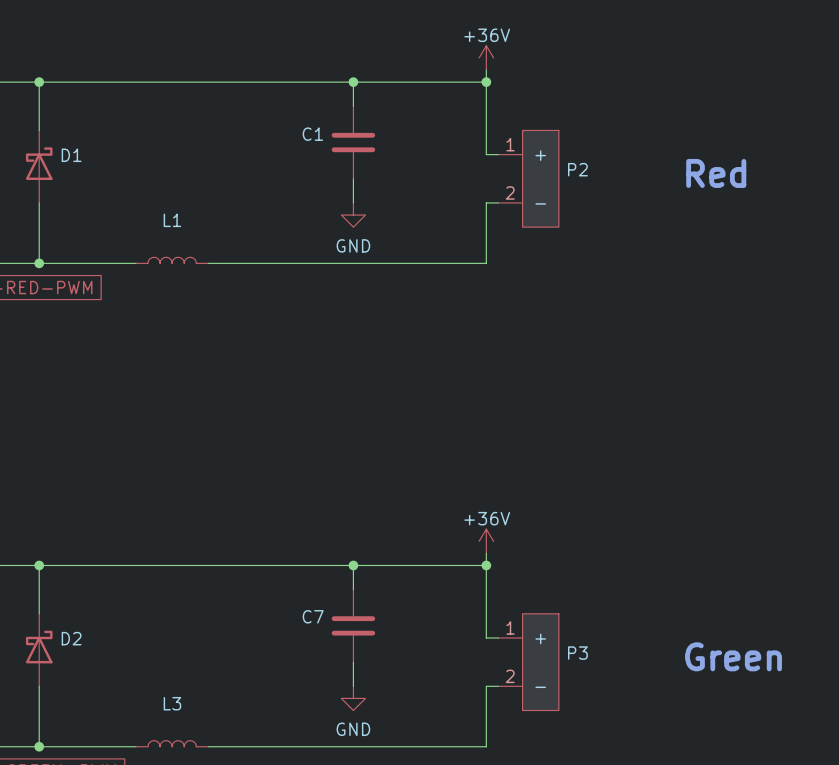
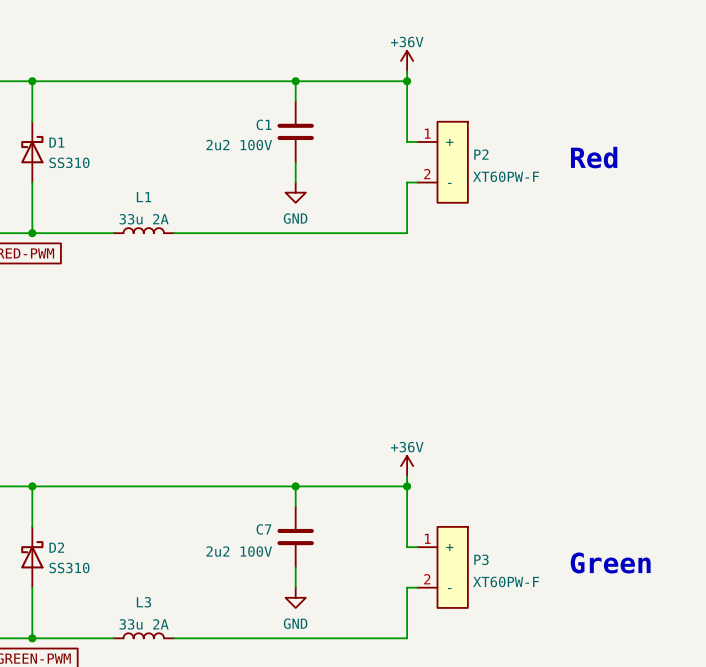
C1 value: none -> 2u2 100V (239, 145)
D1 value: none -> SS310 (69, 162)
P2 value: none -> XT60PW-F (506, 176)
L1 value: none -> 33u 2A (144, 219)
C7 value: none -> 2u2 100V (239, 551)
D2 value: none -> SS310 (69, 567)
P3 value: none -> XT60PW-F (506, 581)
L3 value: none -> 33u 2A (144, 624)

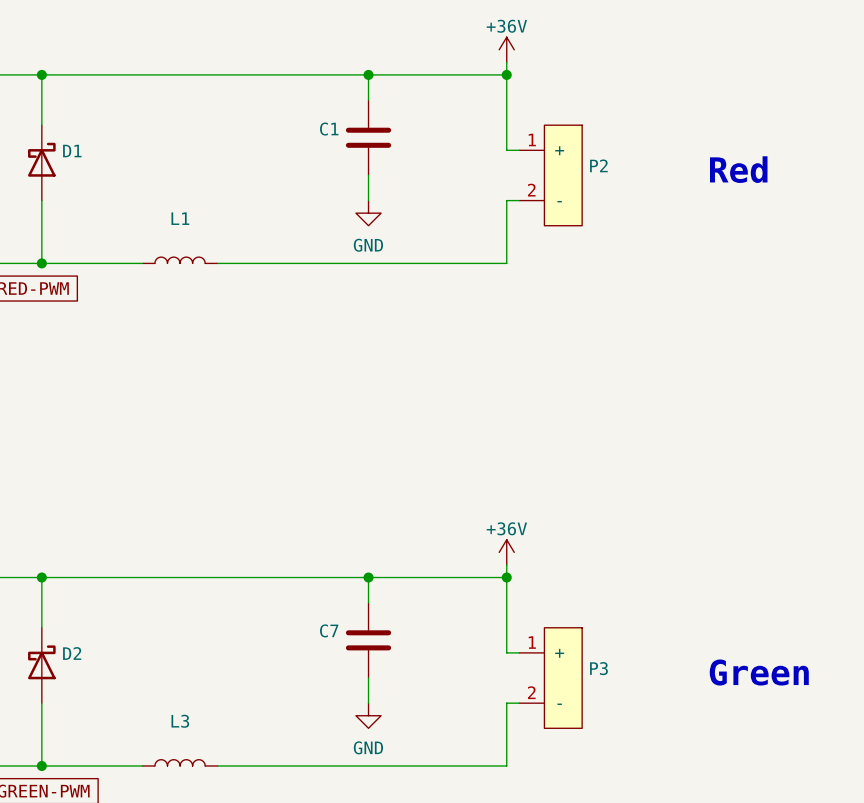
C1 value: 2u2 100V (239, 145) -> none
D1 value: SS310 (69, 162) -> none
P2 value: XT60PW-F (506, 176) -> none
L1 value: 33u 2A (144, 219) -> none
C7 value: 2u2 100V (239, 551) -> none
D2 value: SS310 (69, 567) -> none
P3 value: XT60PW-F (506, 581) -> none
L3 value: 33u 2A (144, 624) -> none

